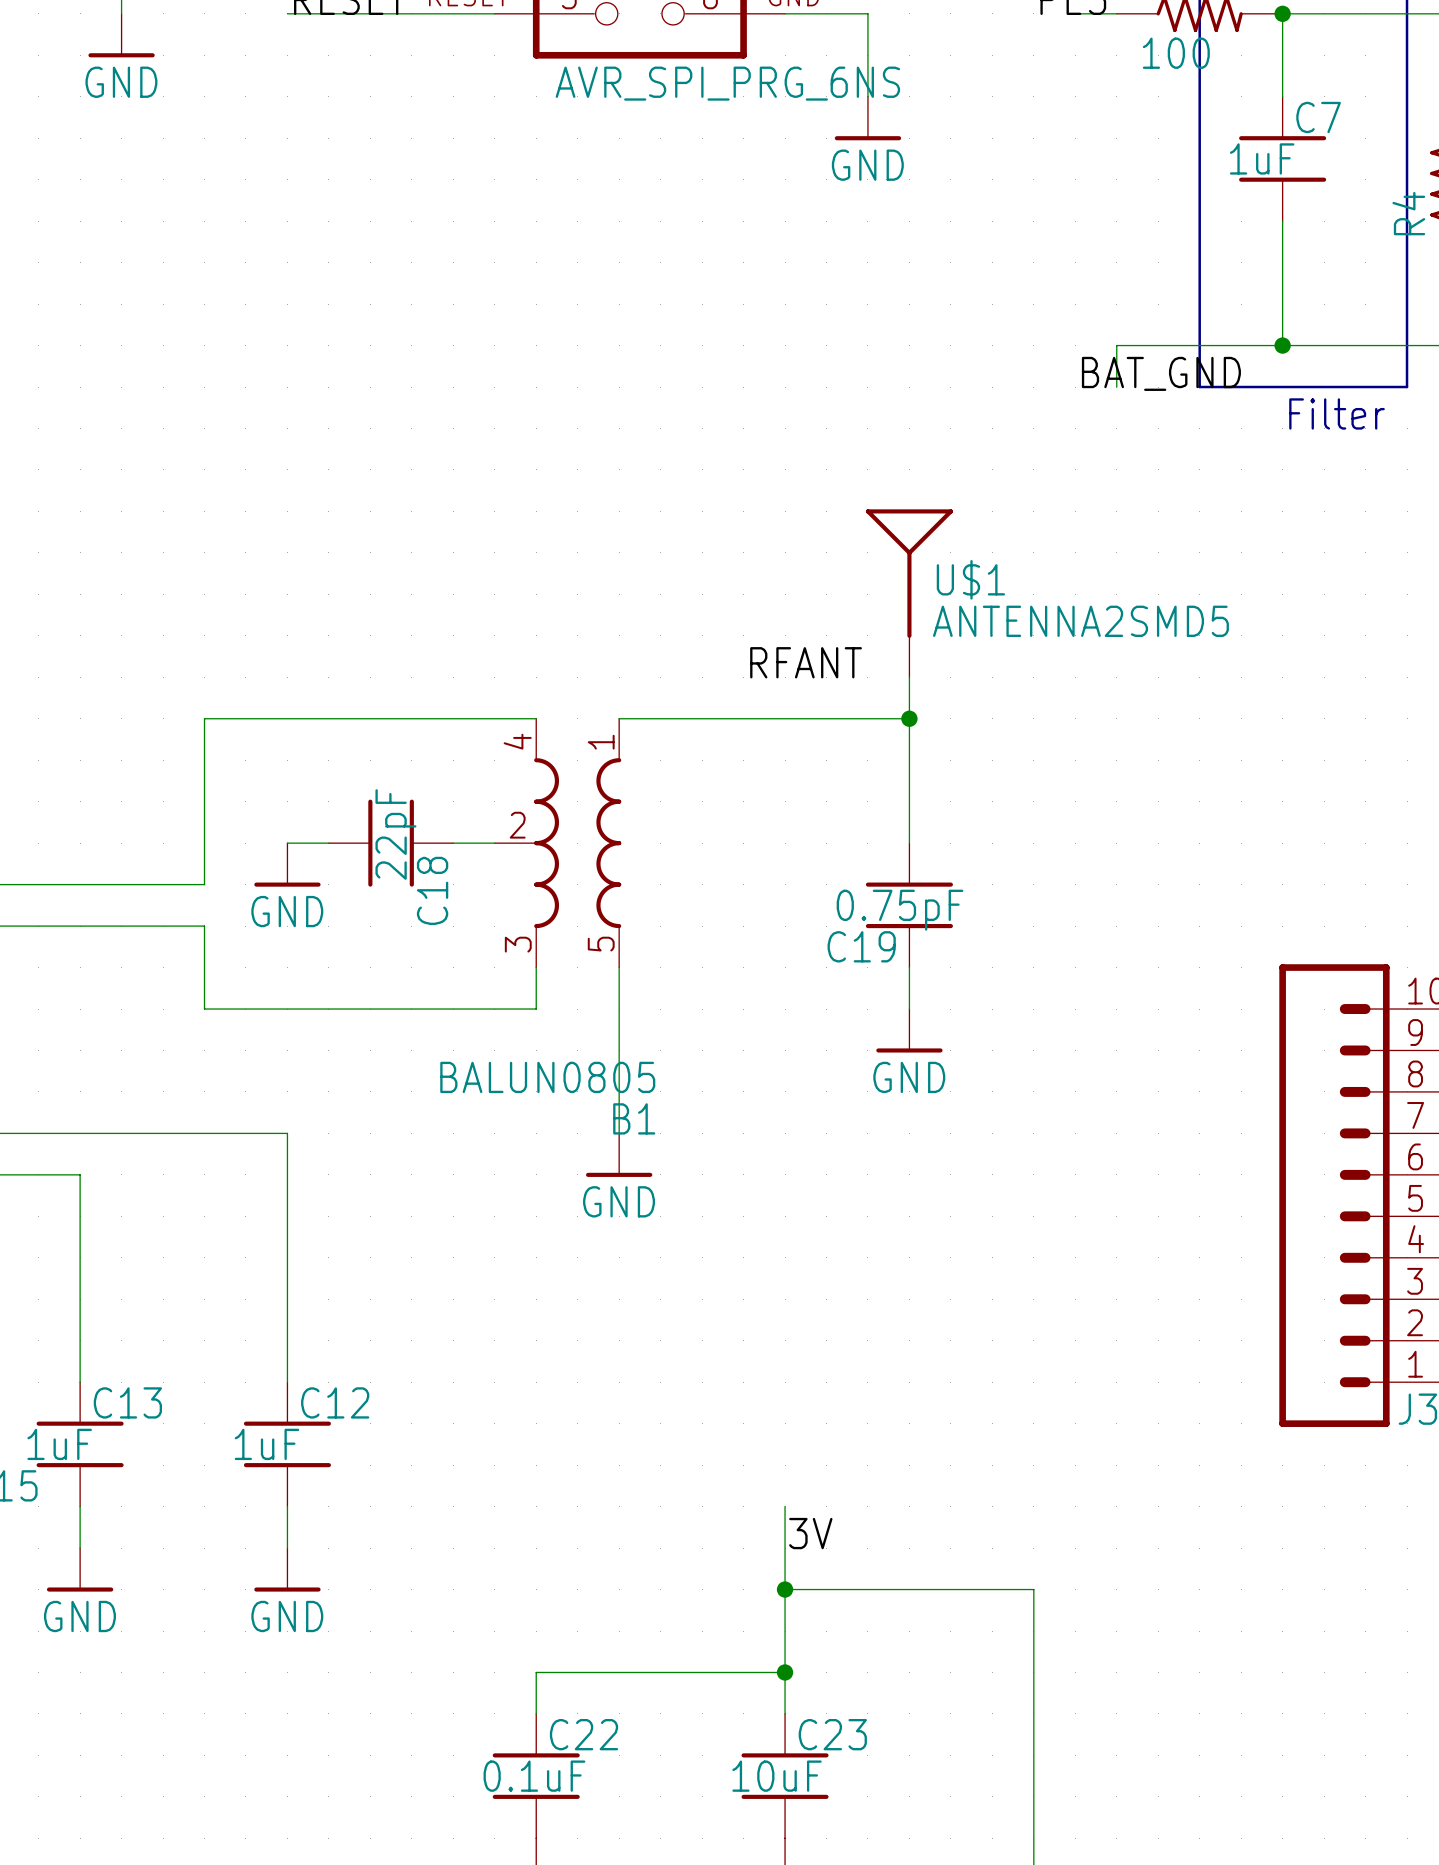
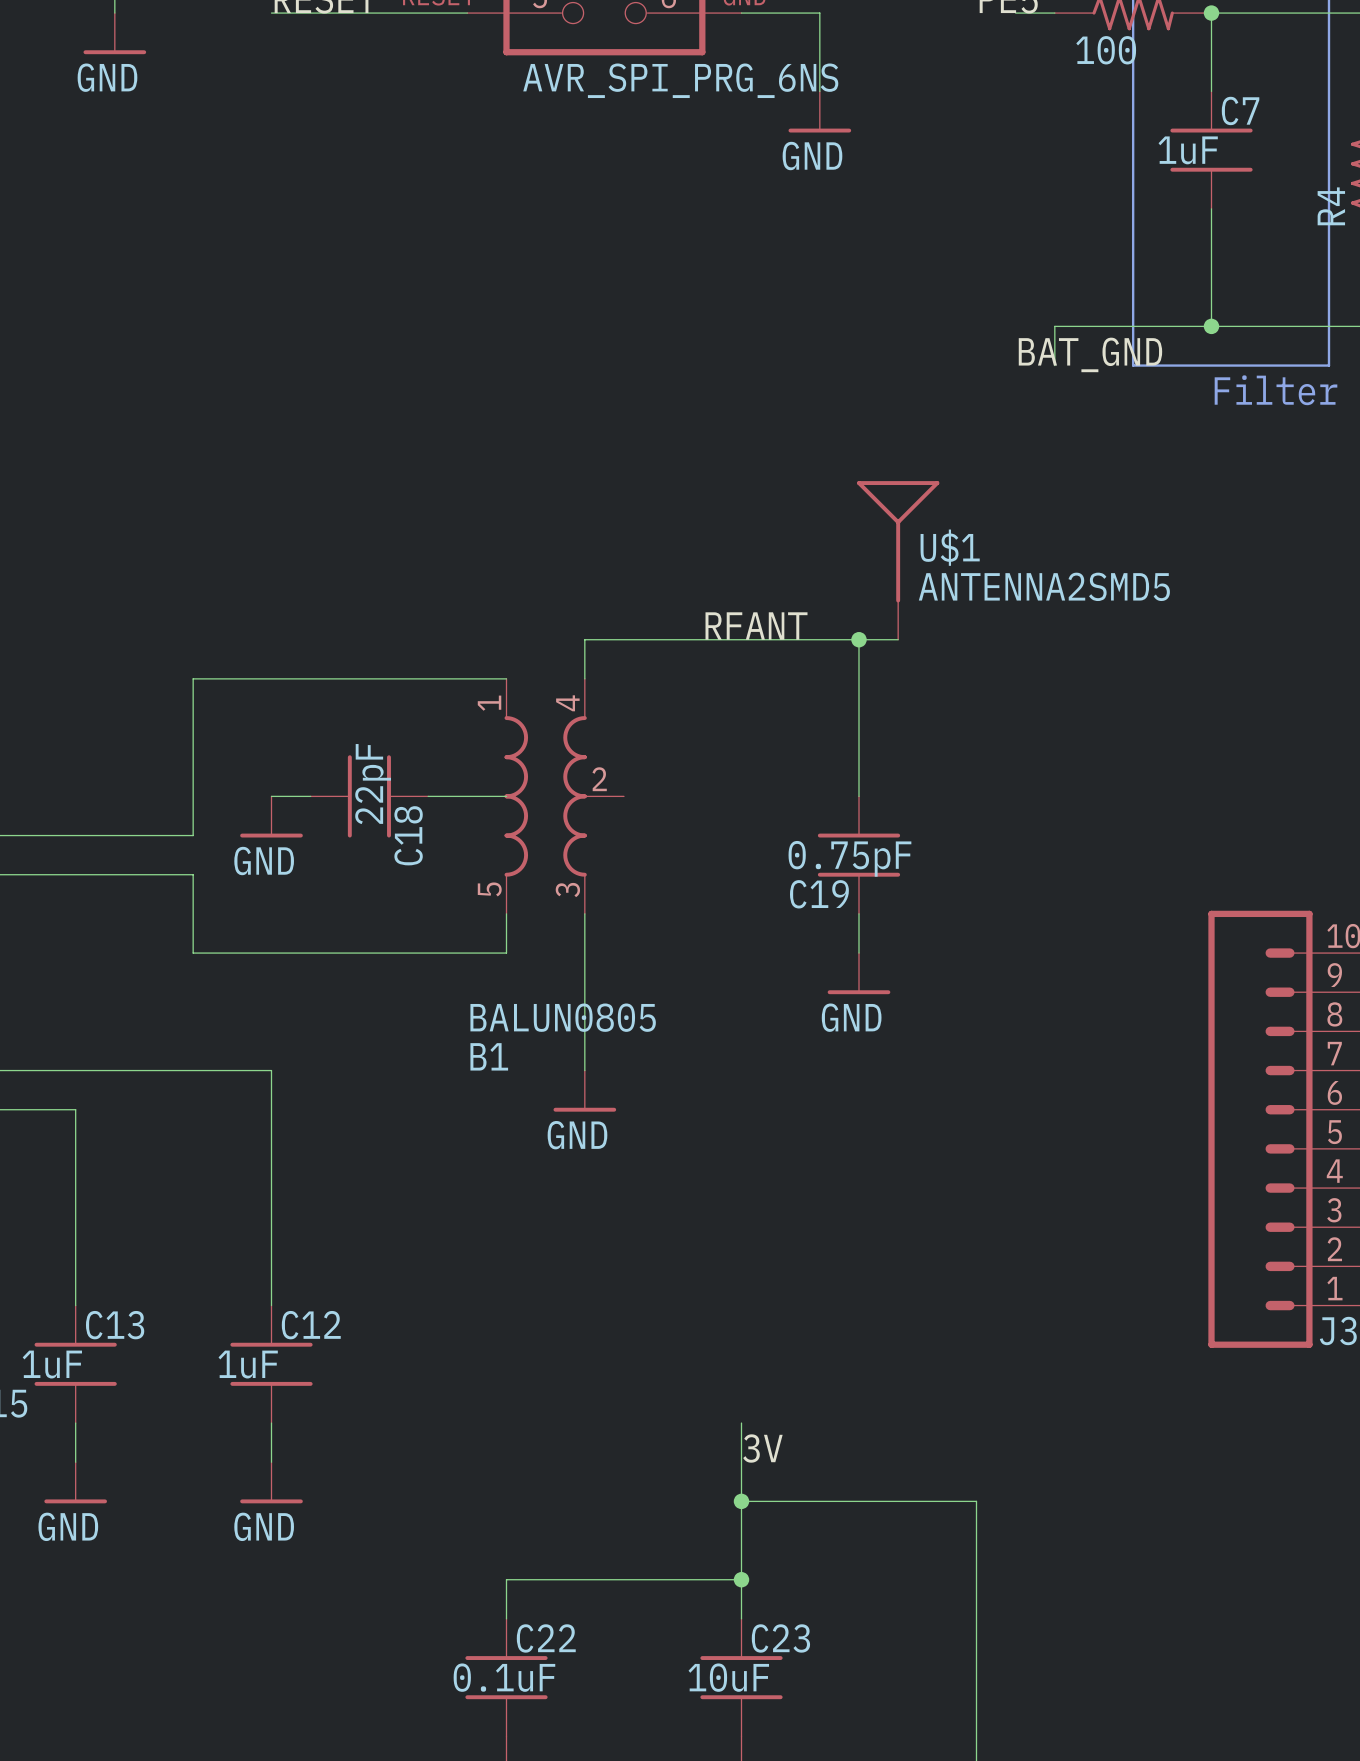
U$1 position: (909, 593) -> (898, 560)
wire: (619, 718) (909, 718) -> (584, 678) (584, 639) (898, 639)
junction position: (909, 718) -> (858, 639)
B1 flip: as is (577, 843) -> left-right (545, 796)

